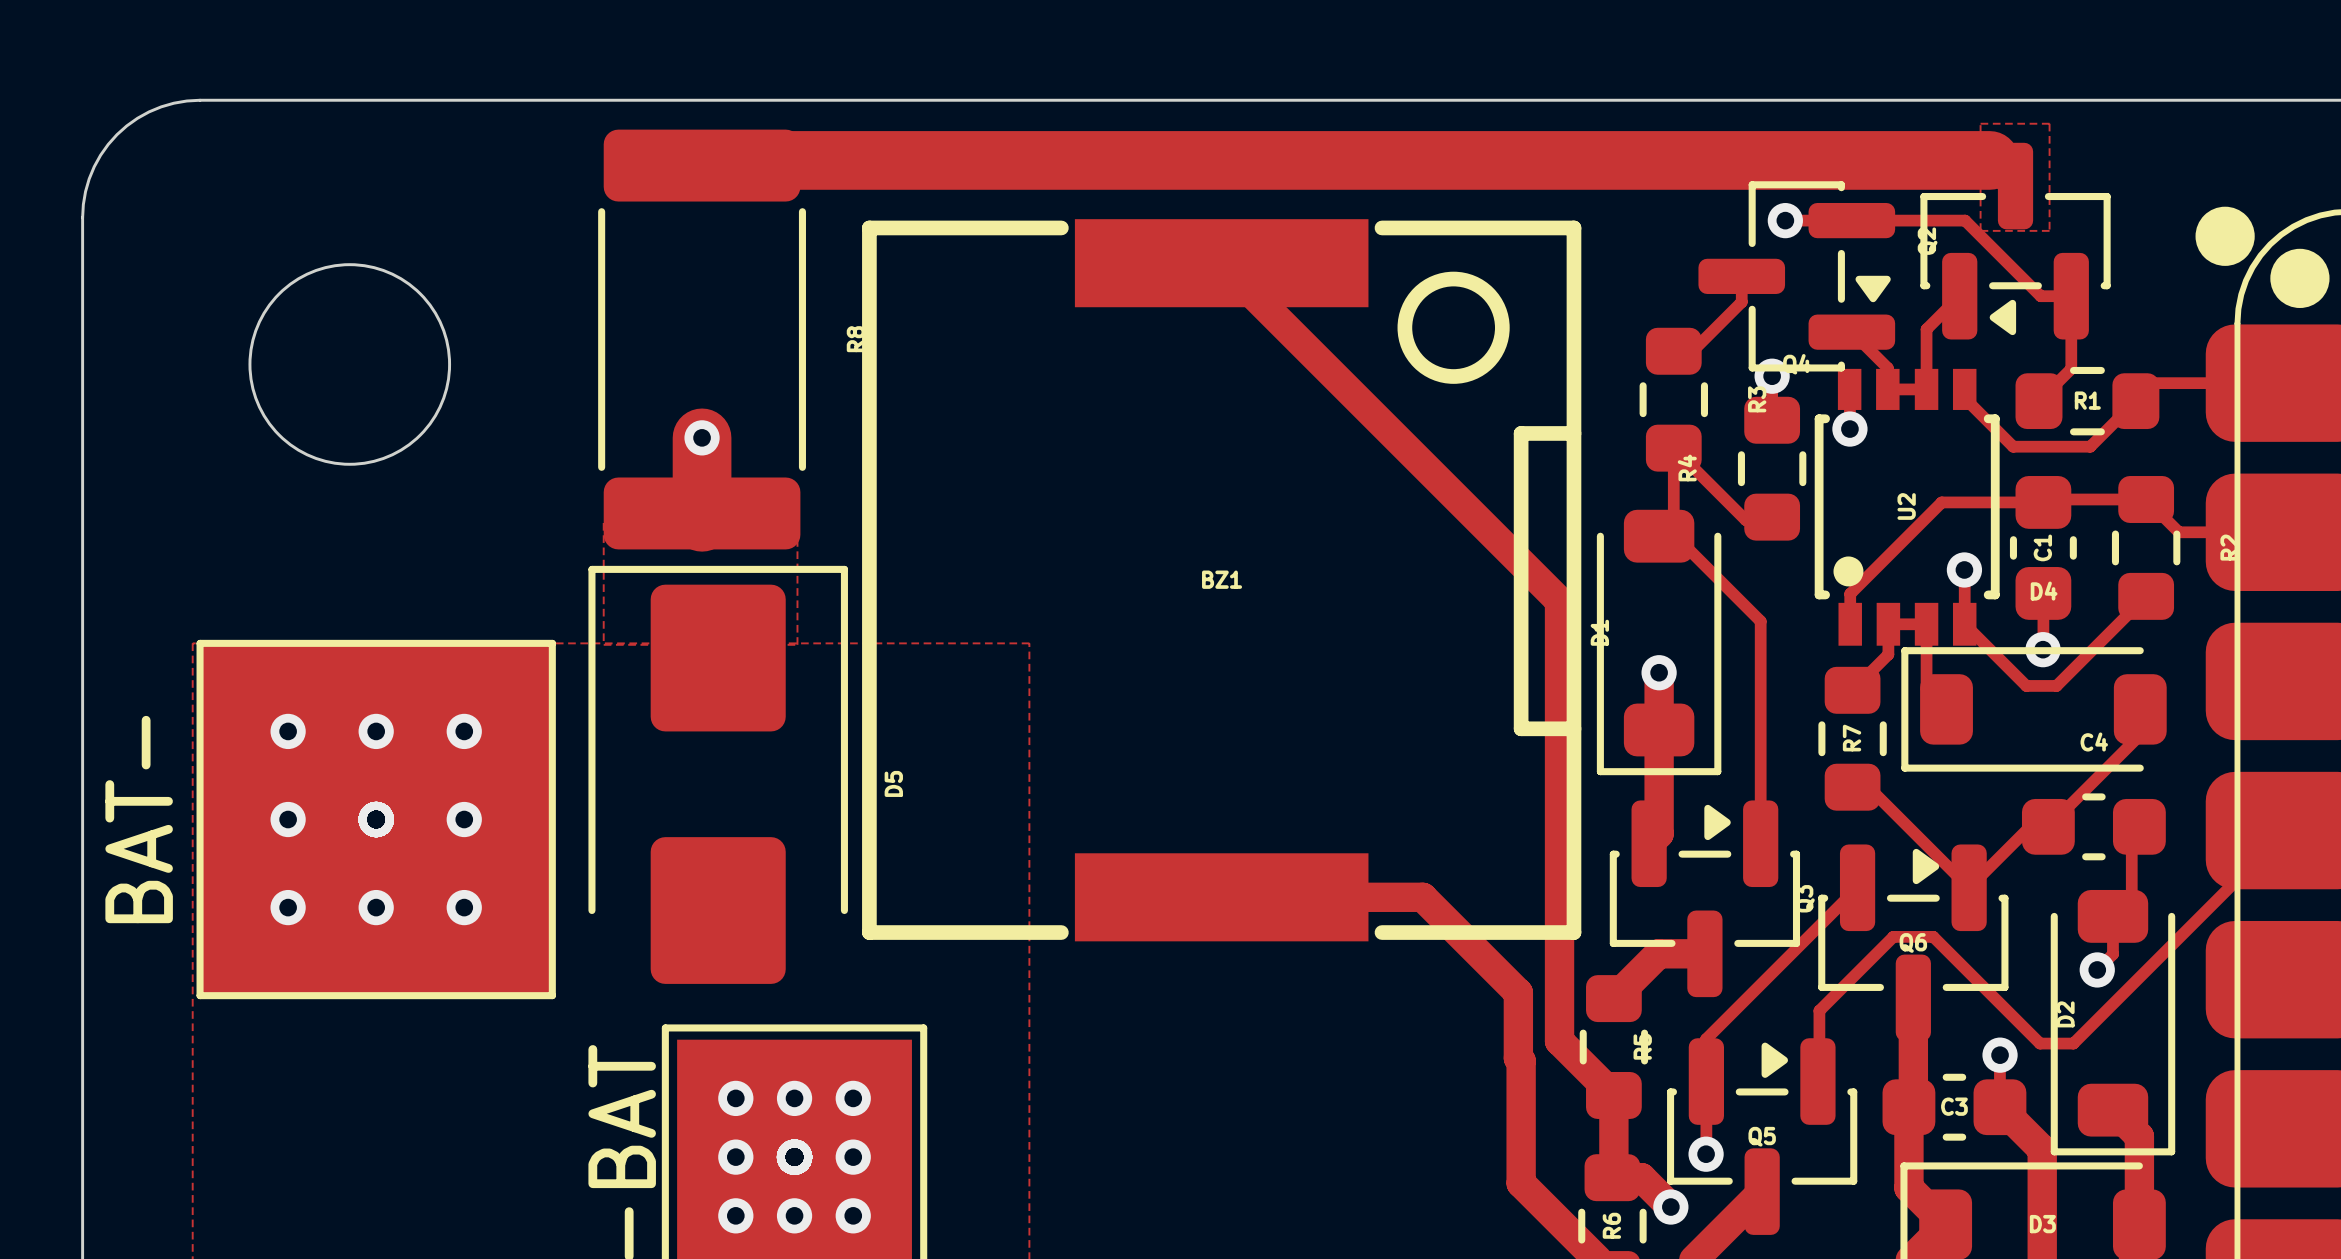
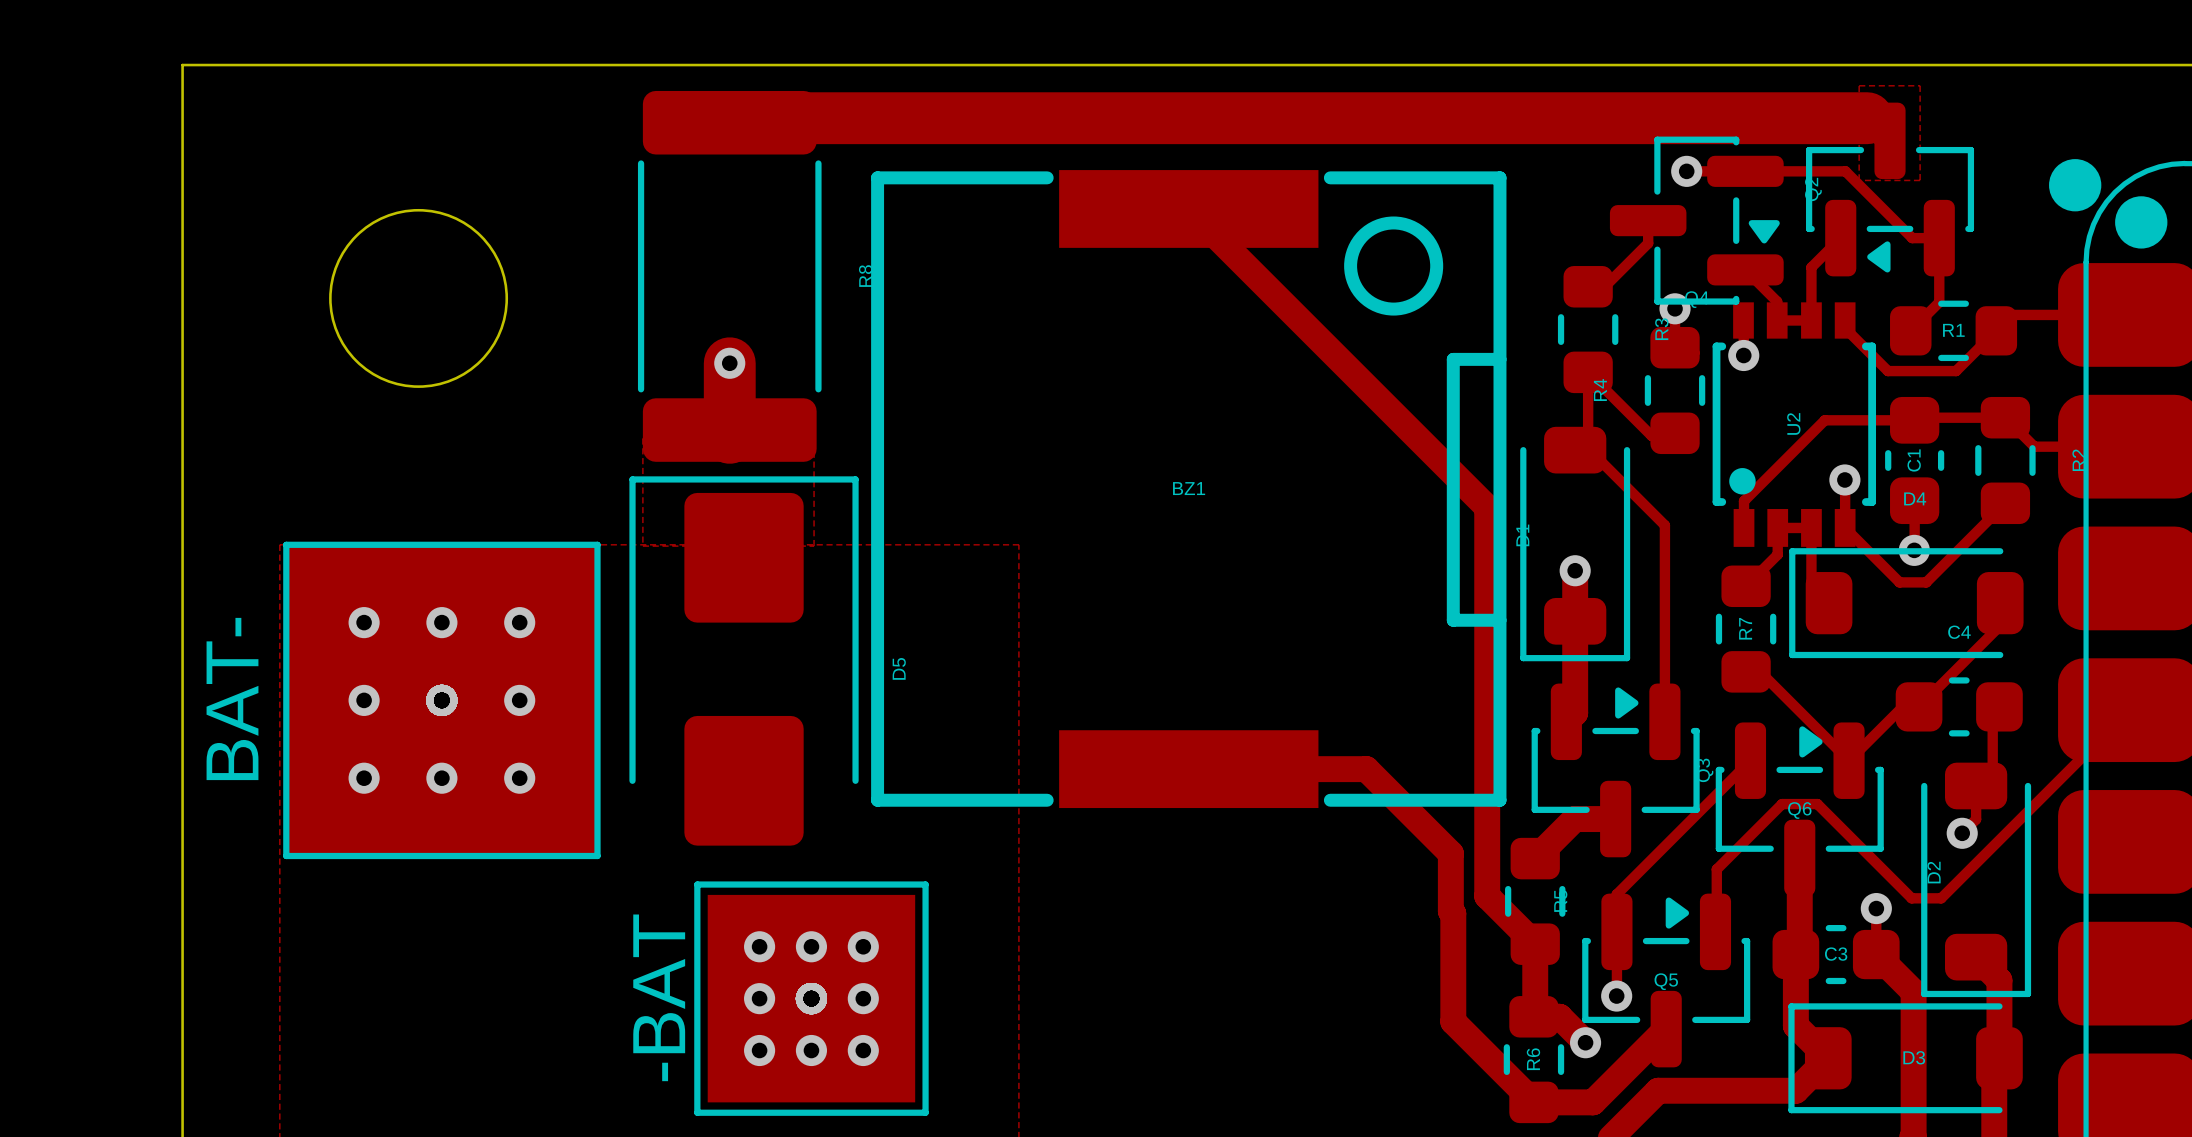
board edge: (200, 100) (161, 106) (137, 118) (117, 134) (94, 166) (85, 191) (82, 217) -> (286, 65) (182, 65) (182, 168)

